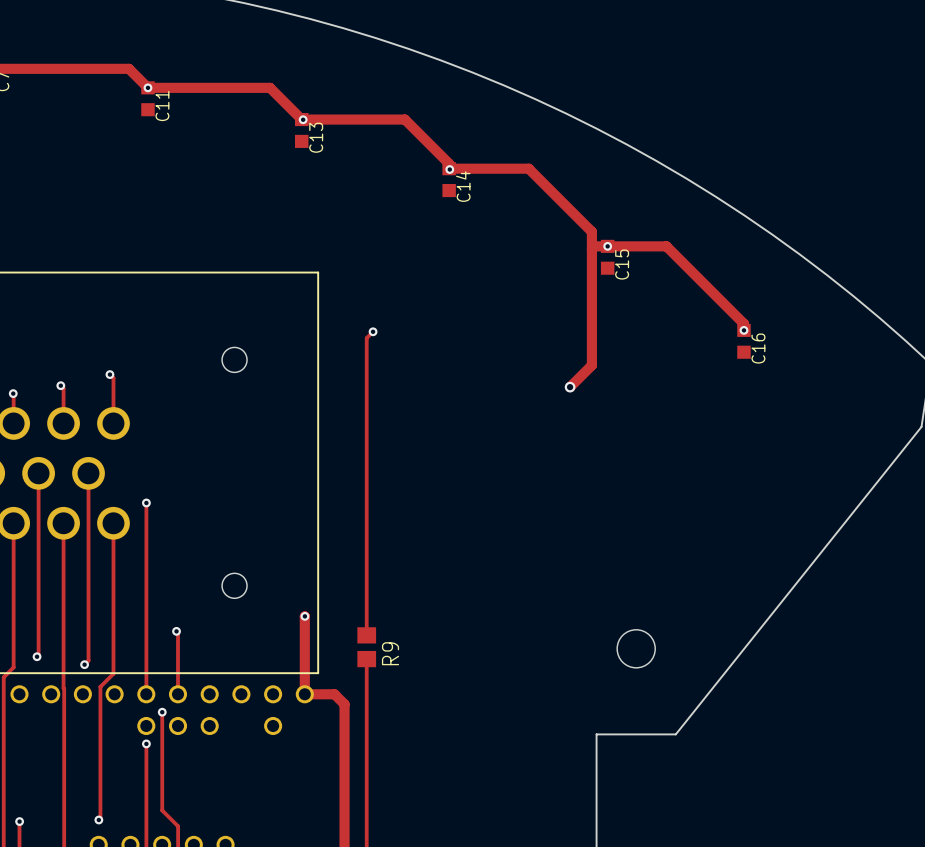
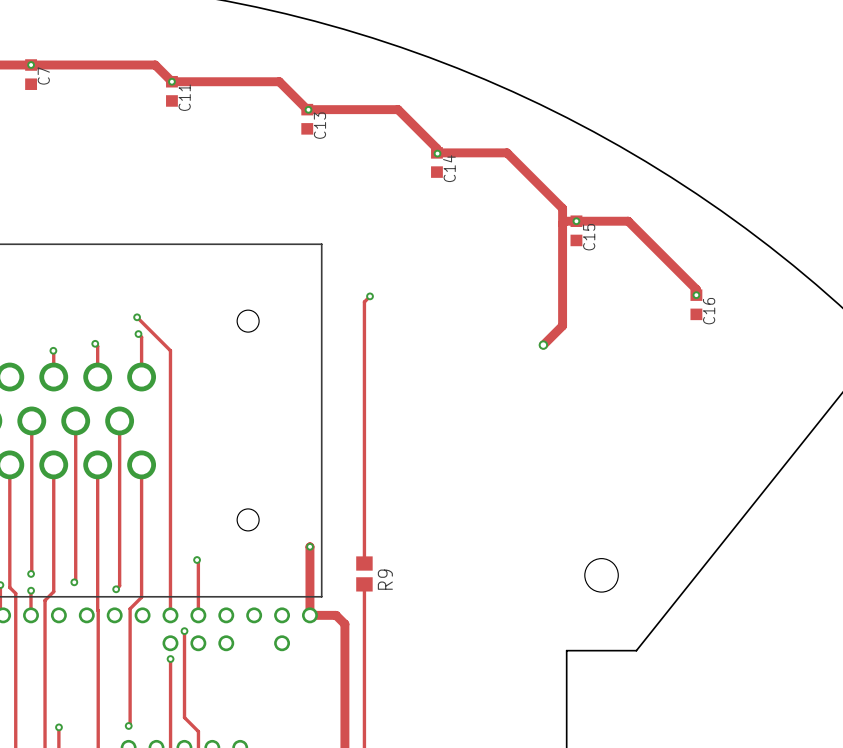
via: none -> (137, 317)
track: (146, 502) (146, 694) -> (137, 317) (170, 350) (170, 615)
via: (146, 502) -> none

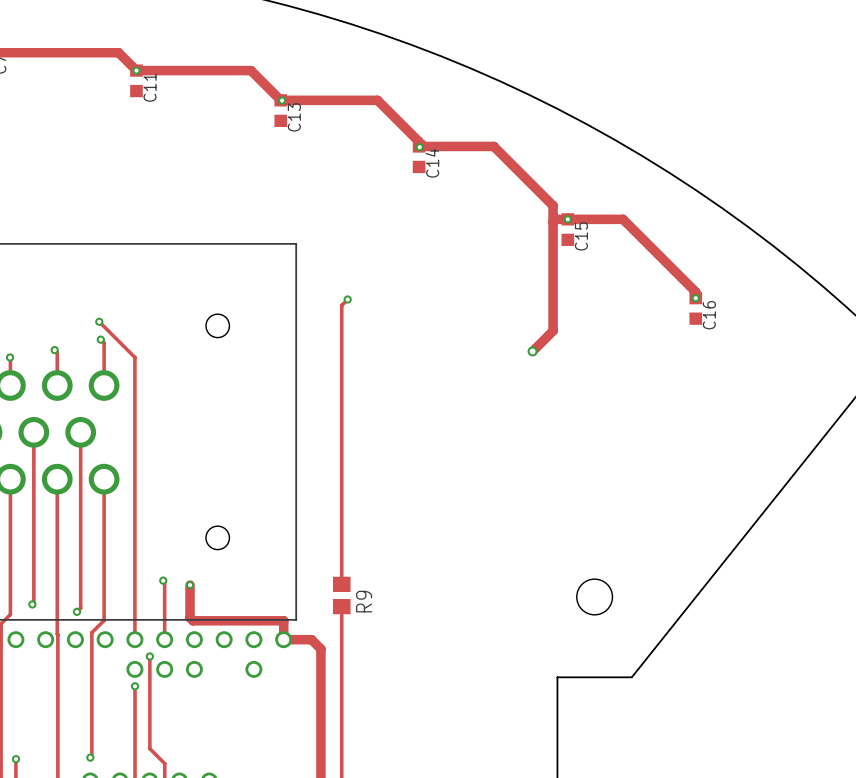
track: (309, 546) (309, 615) -> (190, 585) (190, 617) (193, 620) (283, 620) (283, 639)
via: (310, 546) -> none
via: none -> (190, 585)

